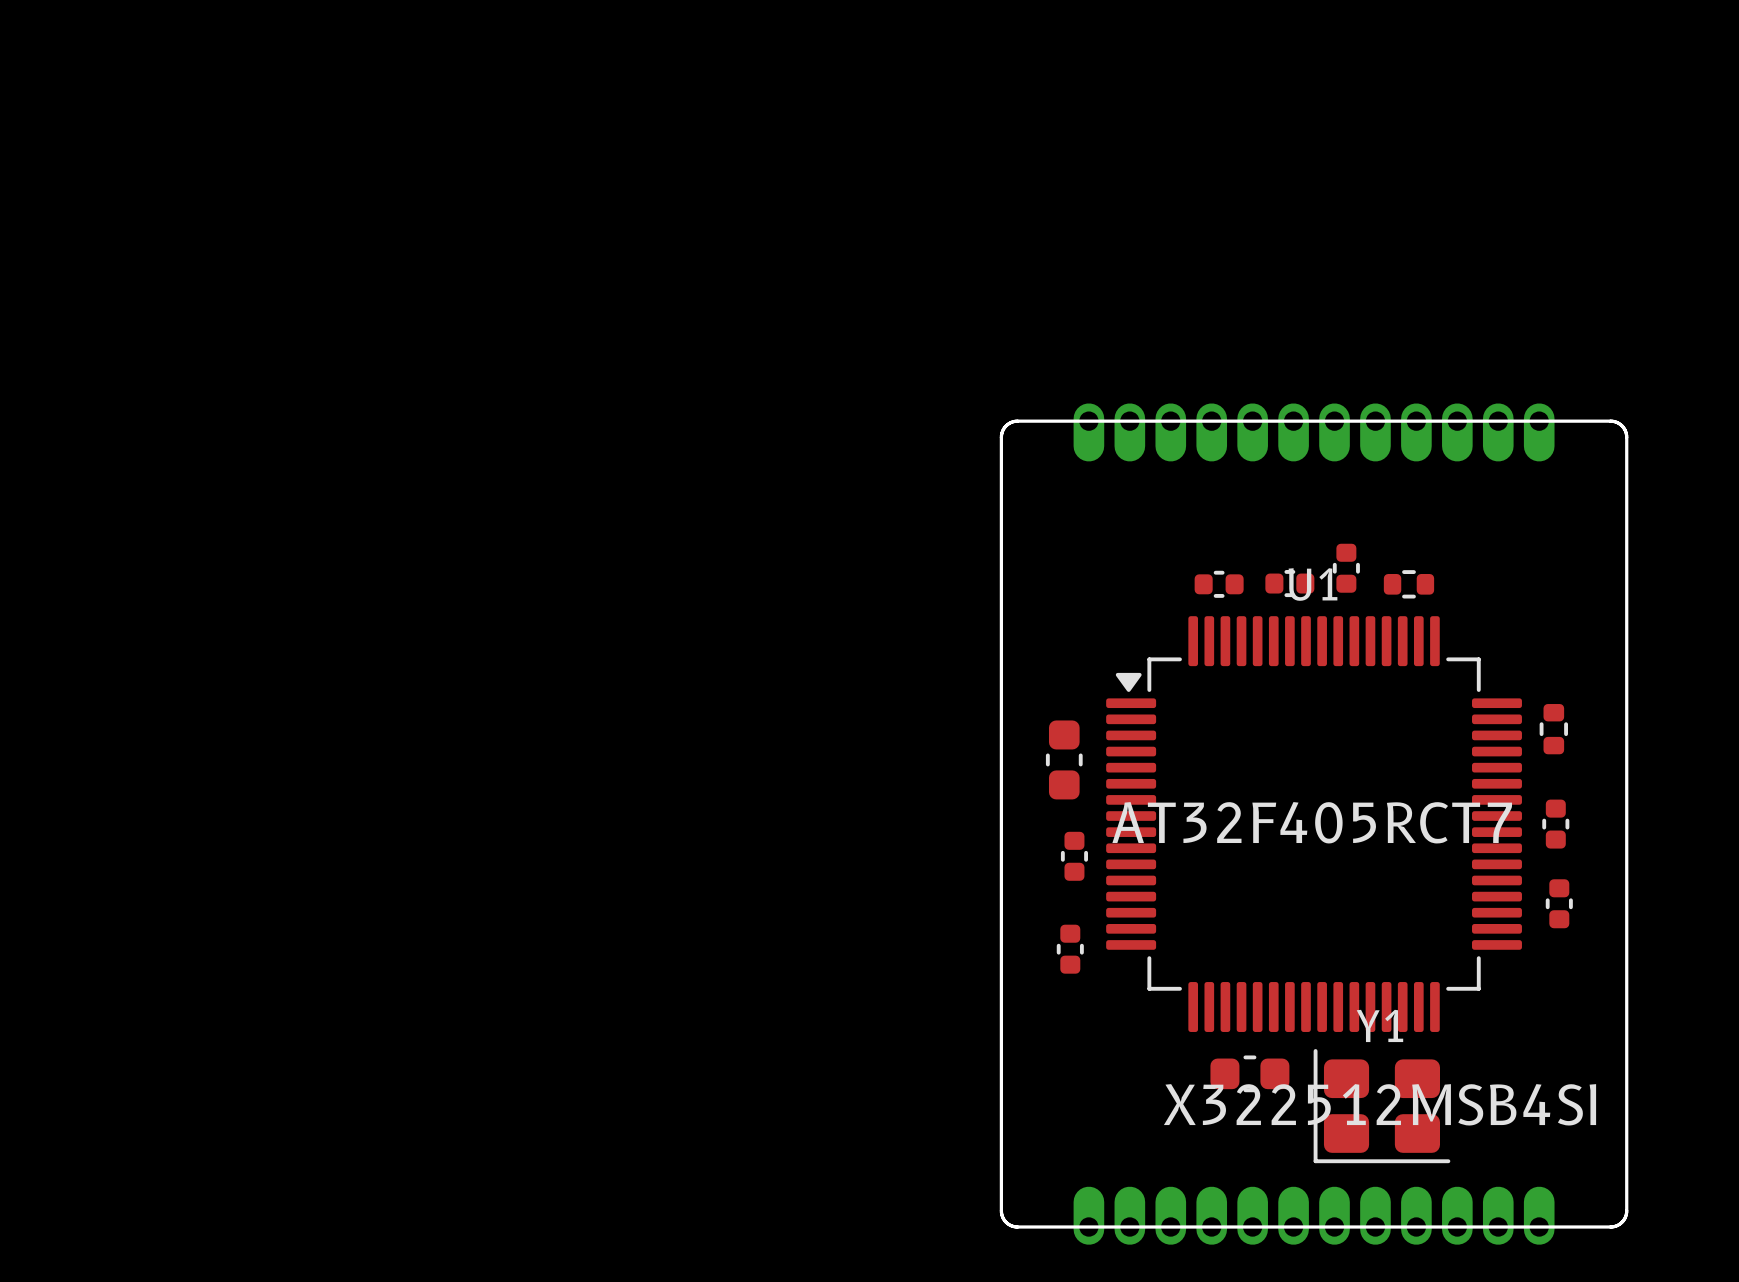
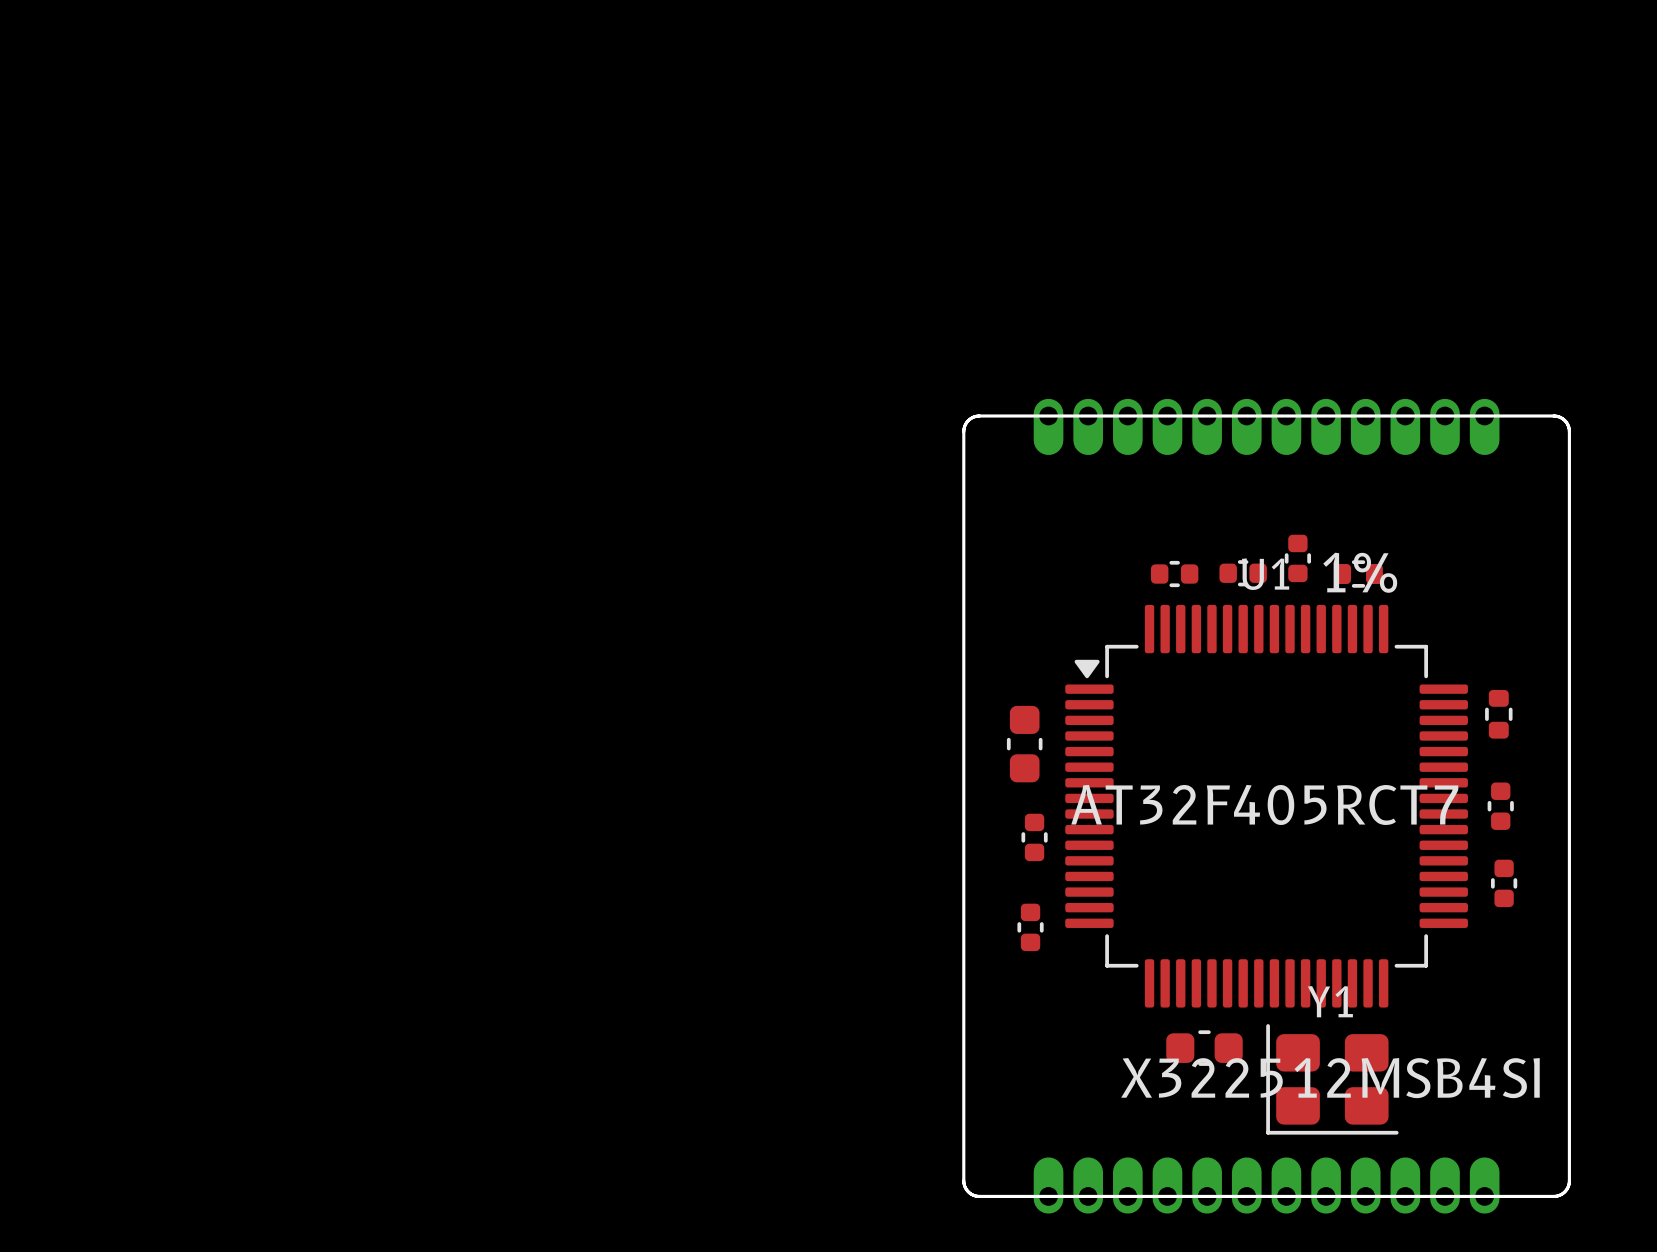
part text: none -> 1% (1360, 572)

